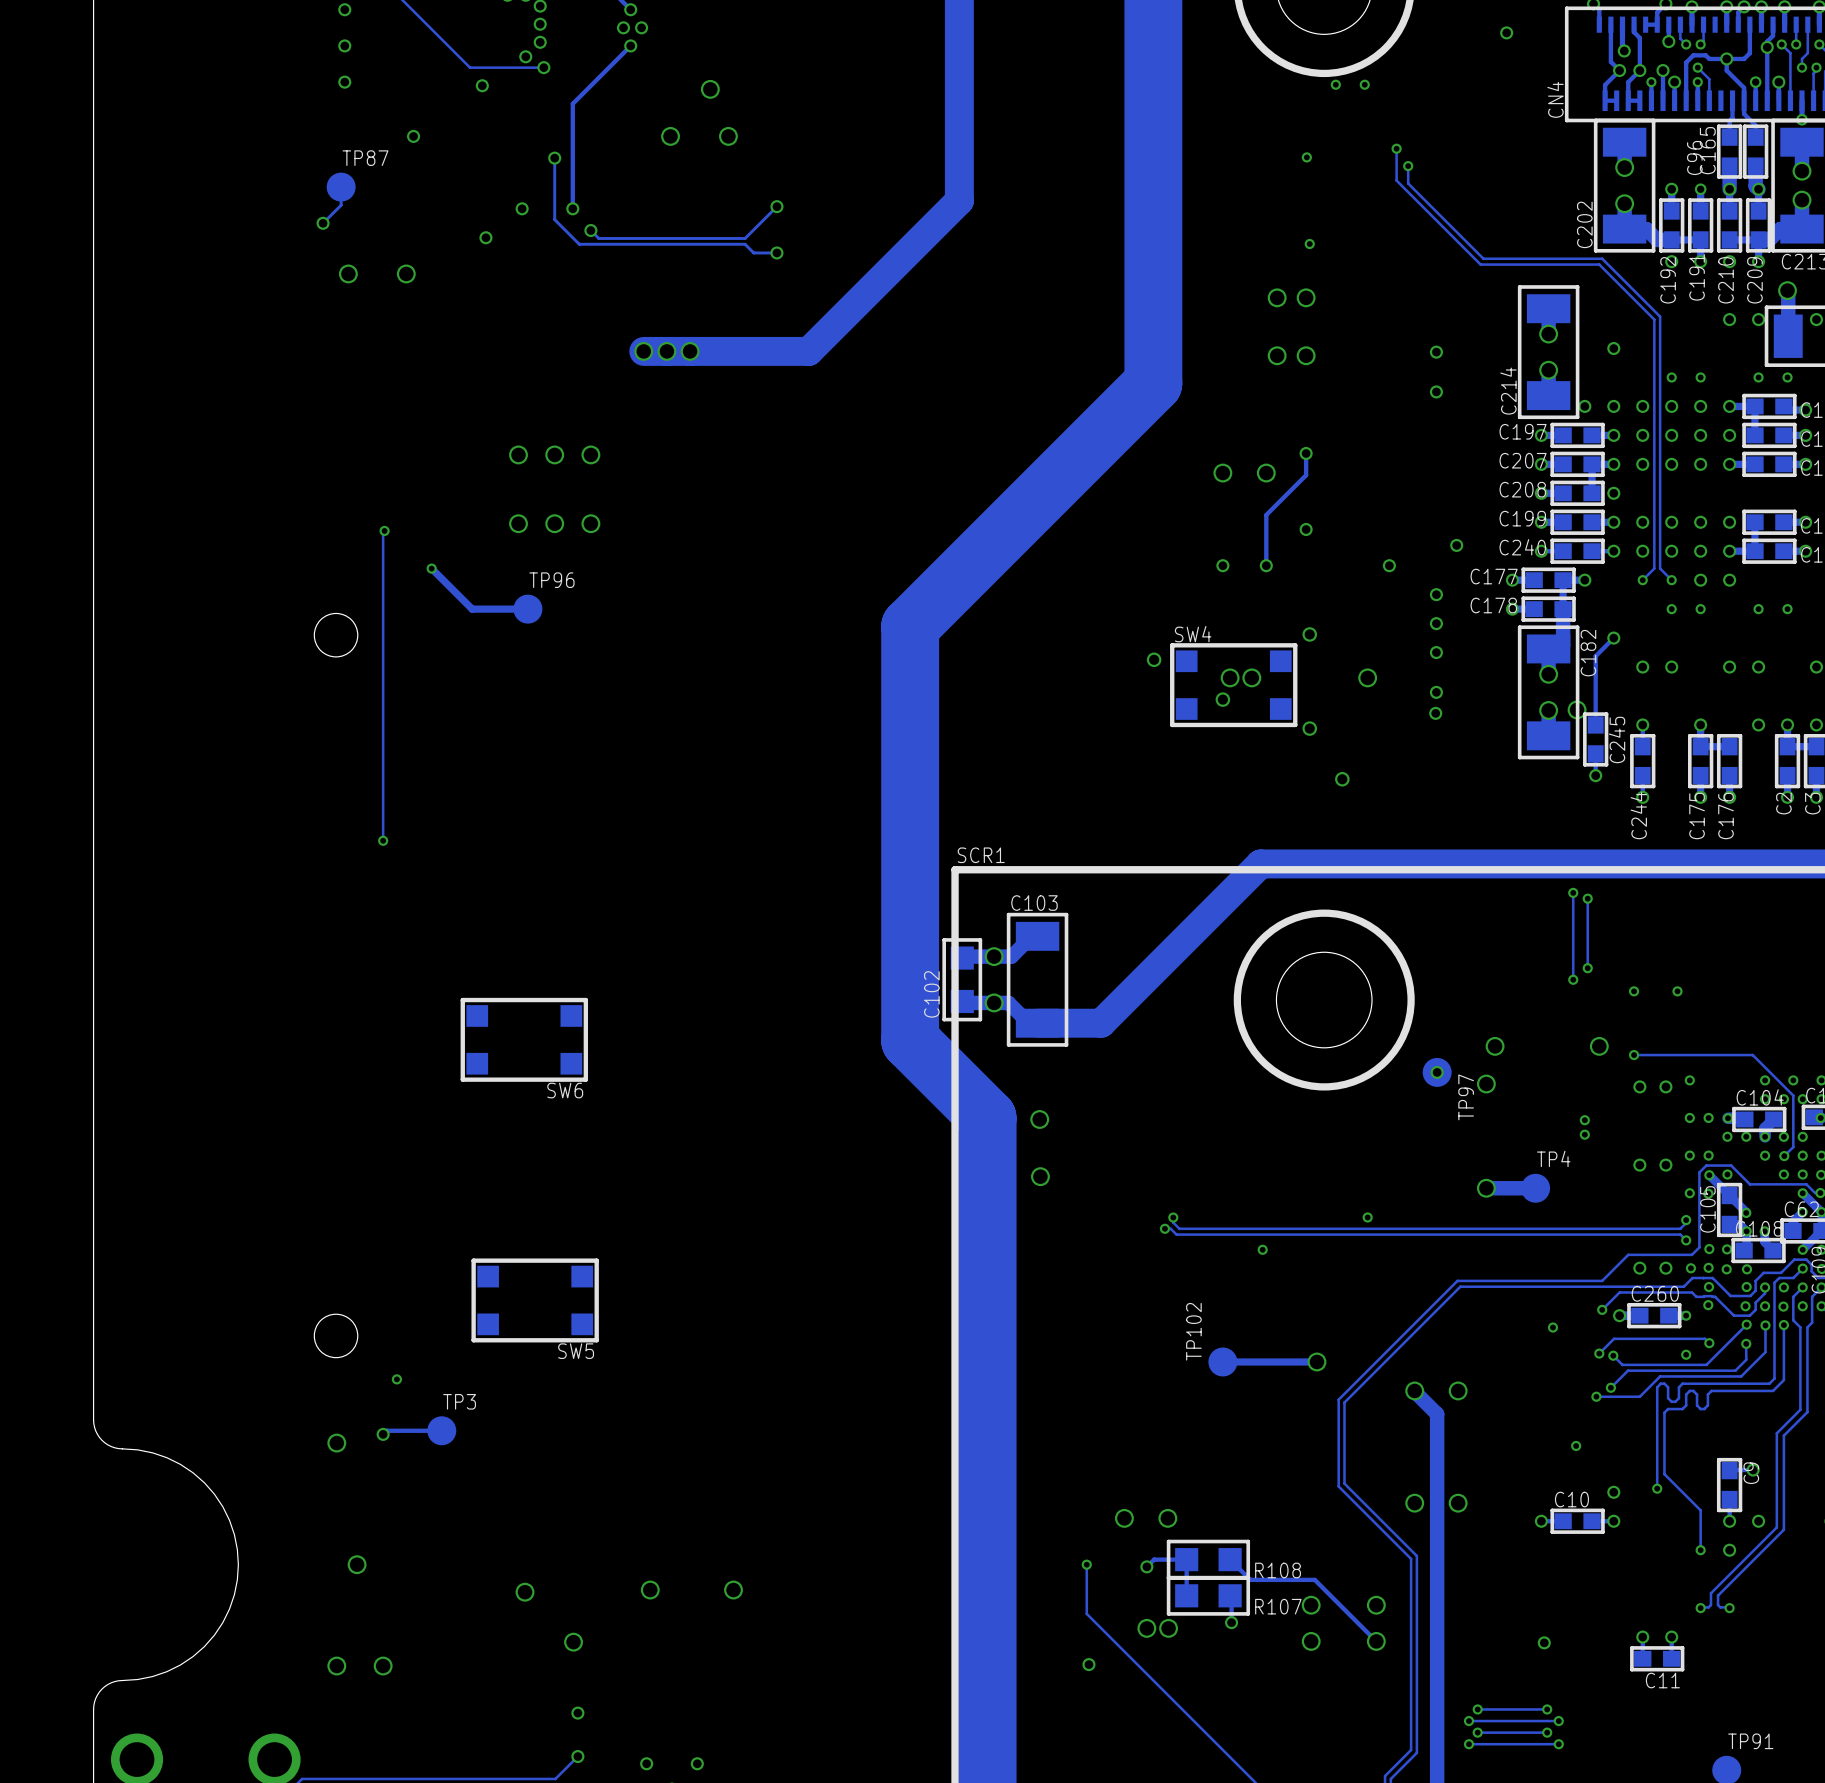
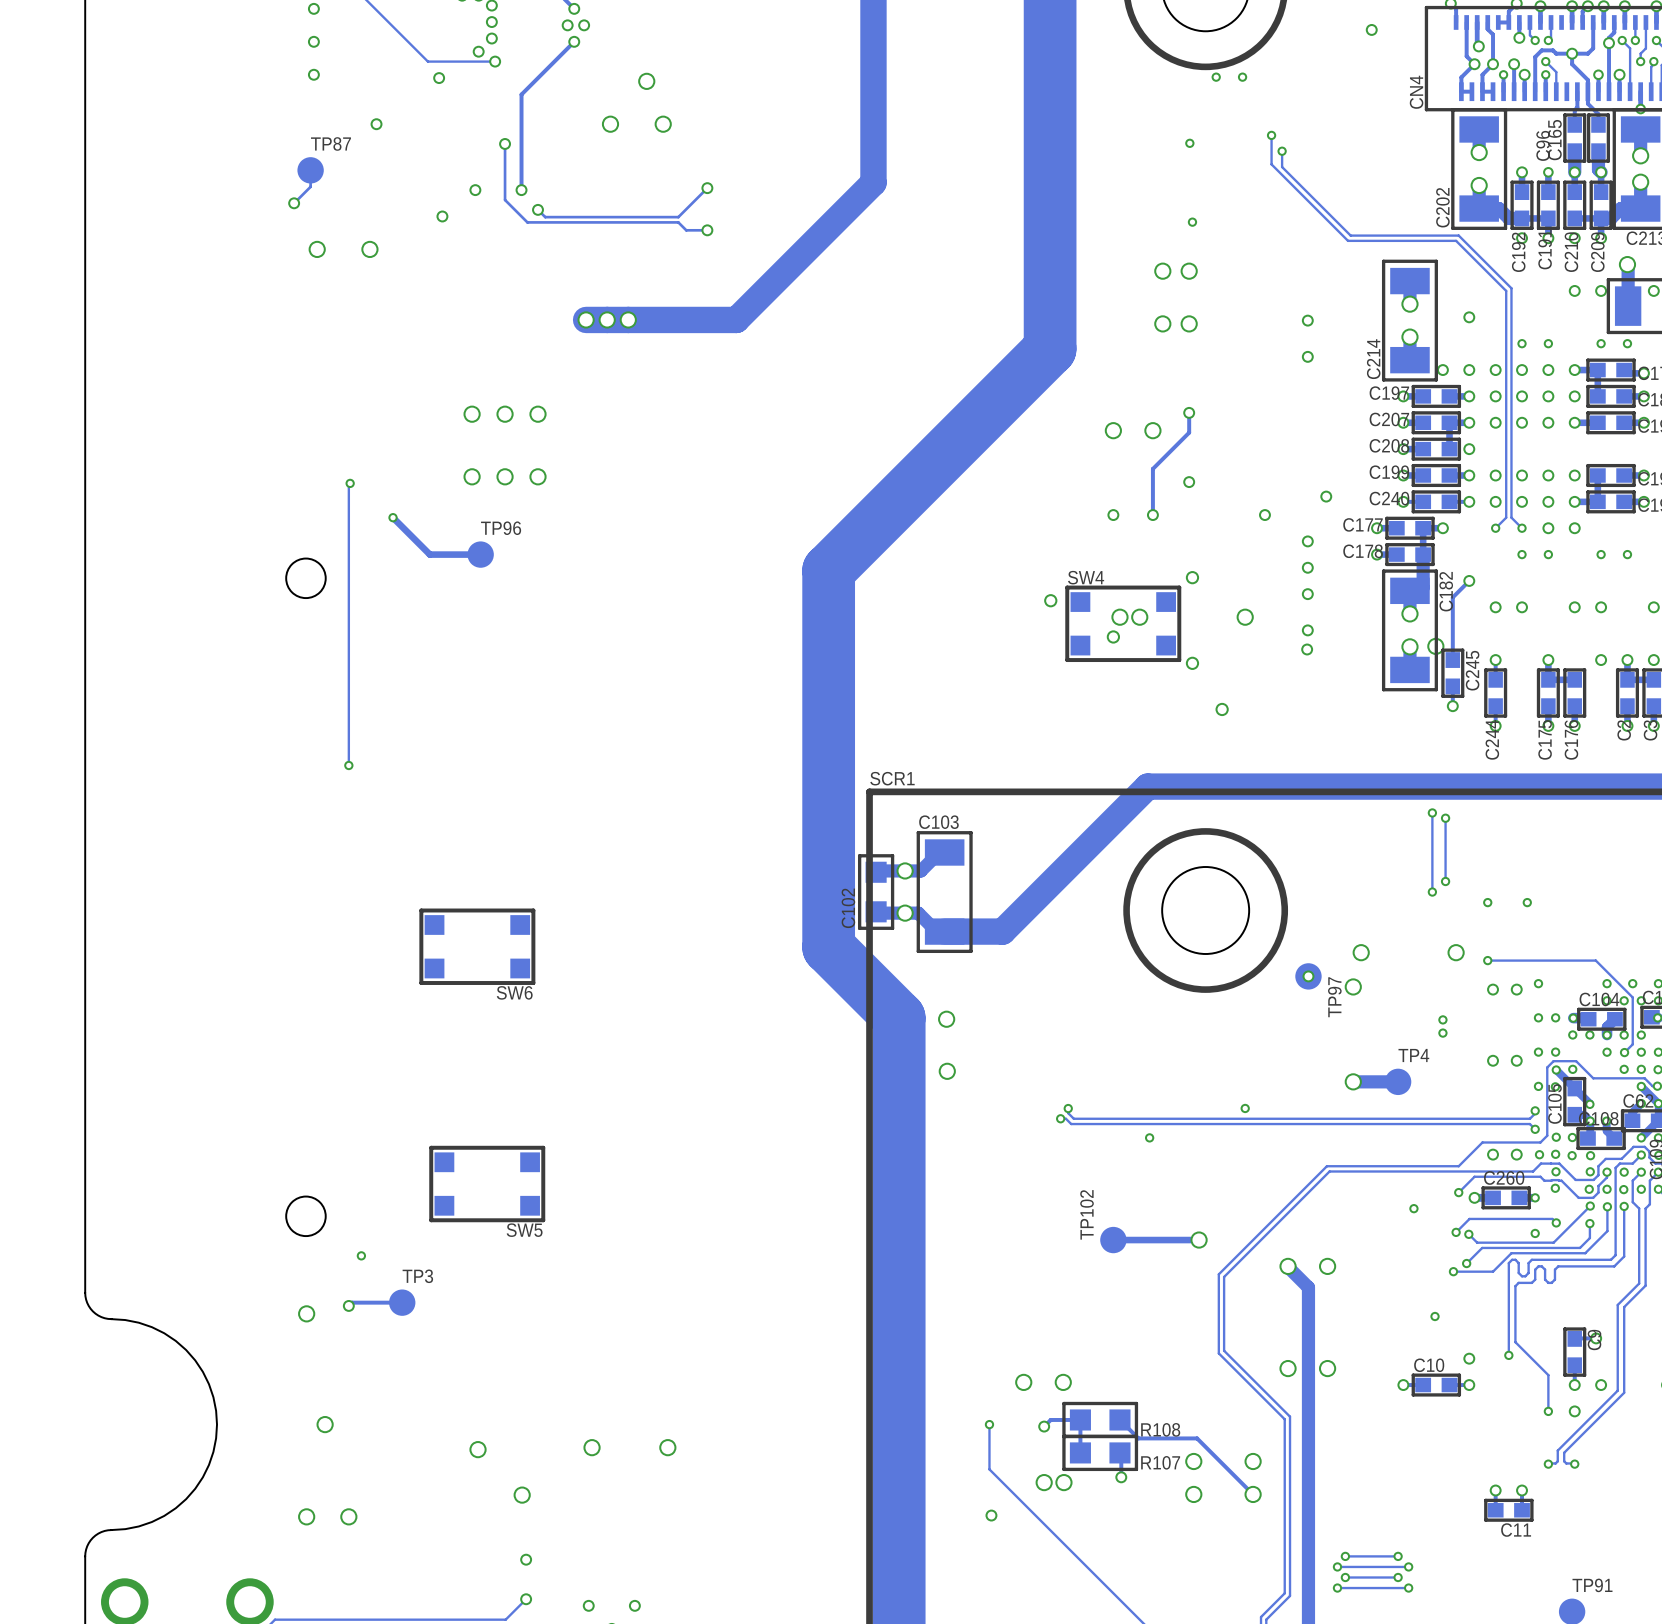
via: (1544, 1642) -> none
via: none -> (1398, 1556)
track: (1547, 1709) (1535, 1709) -> none
via: (1547, 1709) -> none
via: none -> (1408, 1566)
track: (1558, 1721) (1547, 1721) -> none
via: (1558, 1721) -> none
via: none -> (1398, 1577)
track: (1547, 1732) (1535, 1732) -> none
via: (1547, 1732) -> none
via: none -> (1408, 1588)
track: (1558, 1744) (1547, 1744) -> none
via: (1558, 1744) -> none

